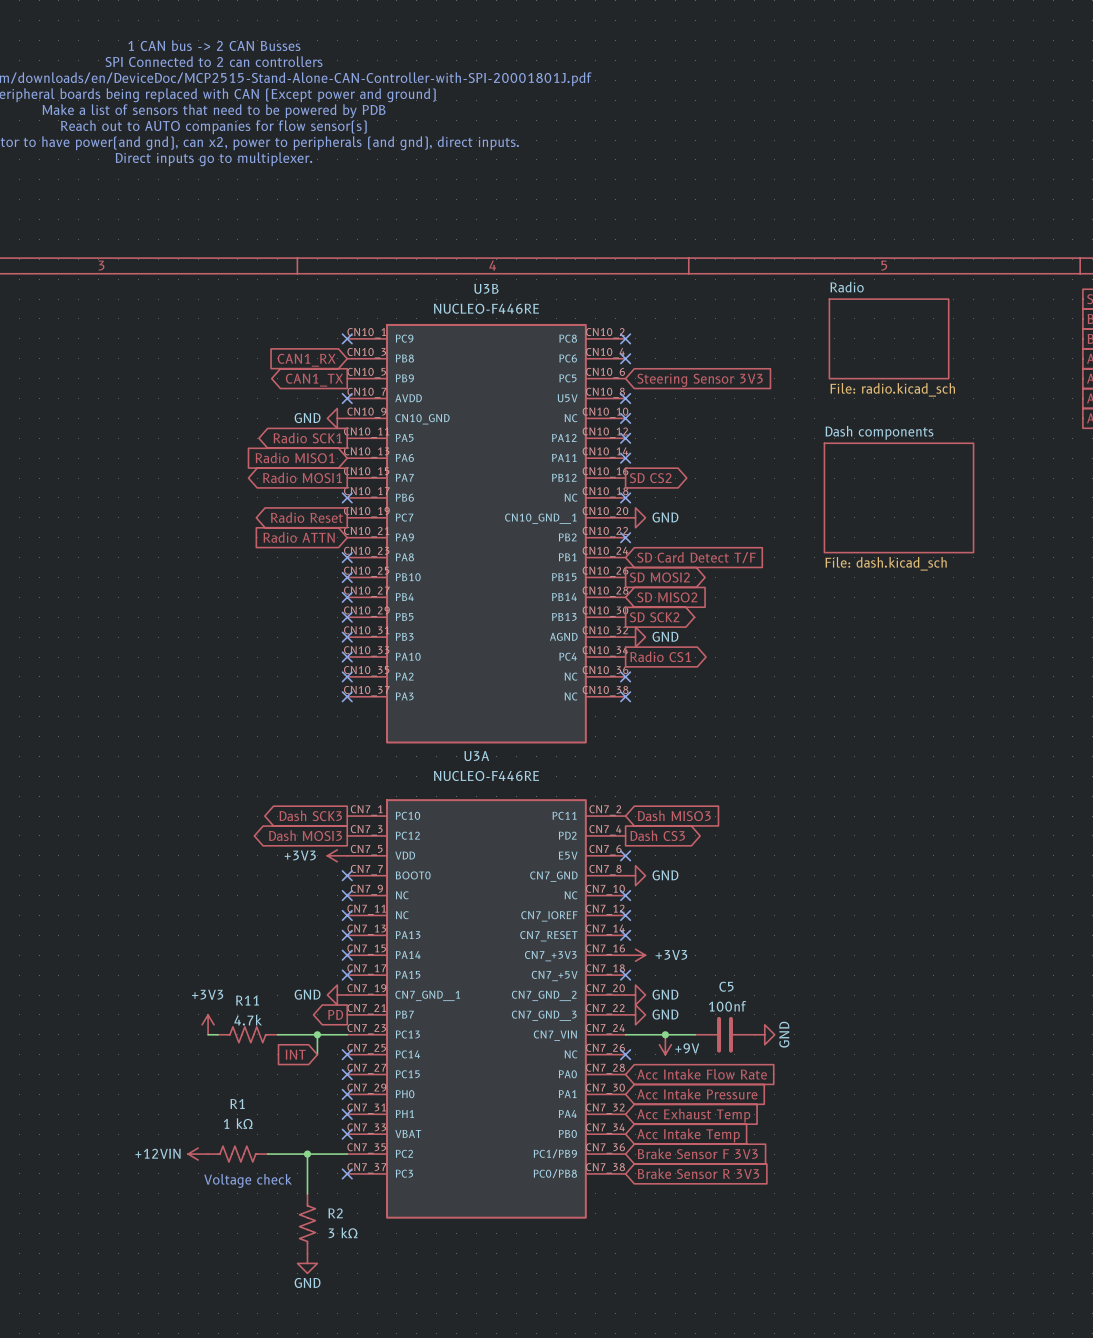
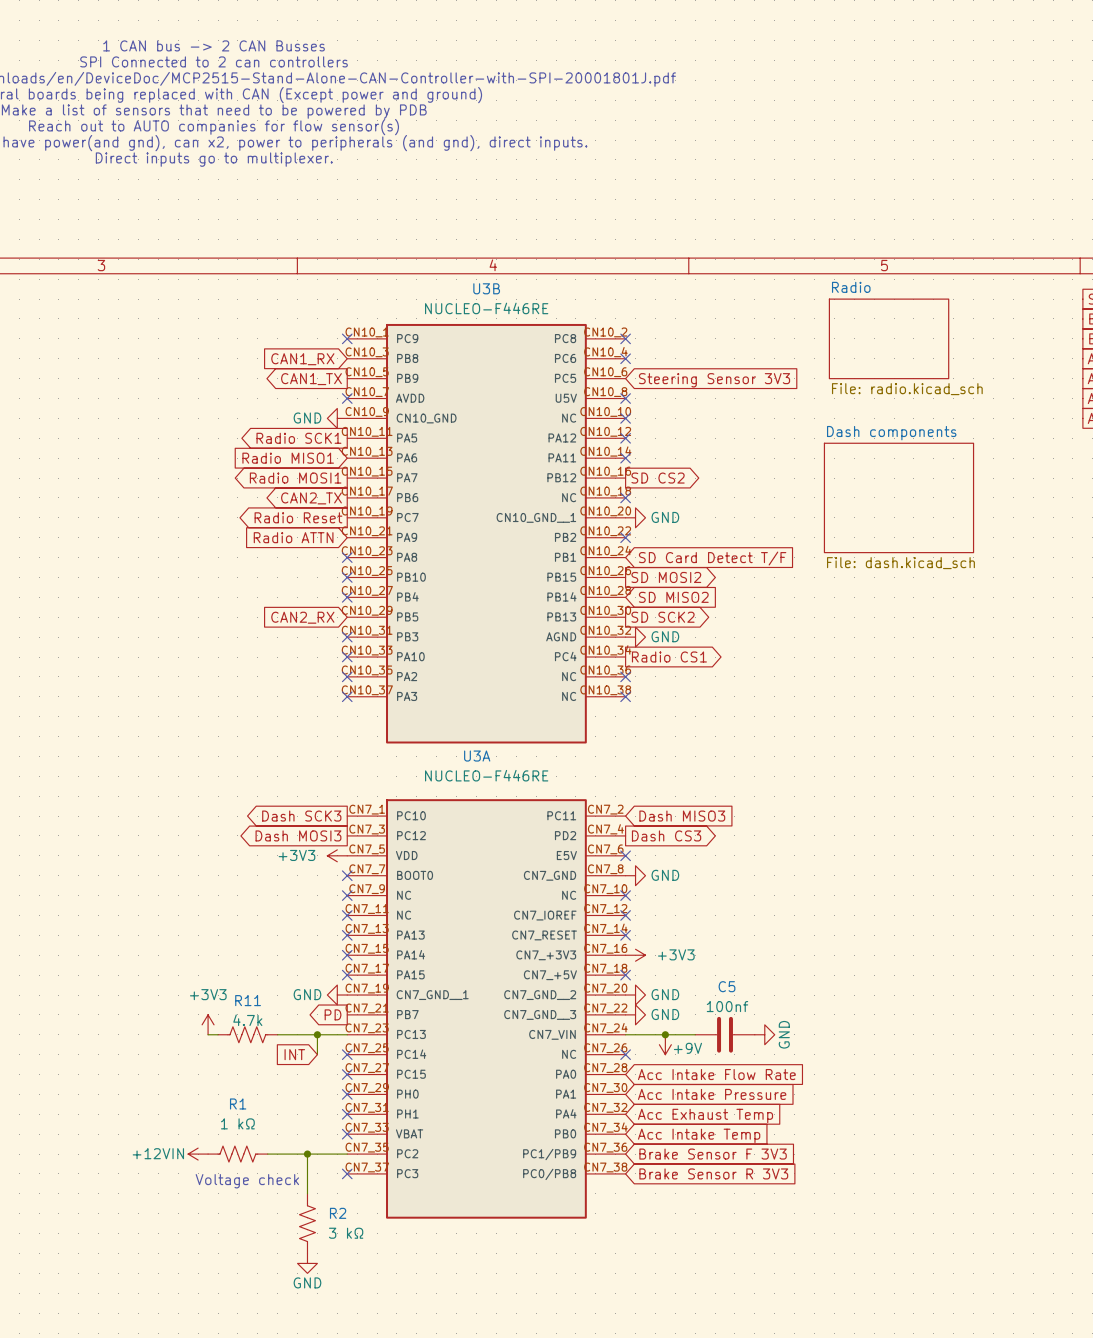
no-connect mark: (347, 497) -> none
global label: none -> CAN2_TX (311, 498)
no-connect mark: (347, 617) -> none
global label: none -> CAN2_RX (302, 617)

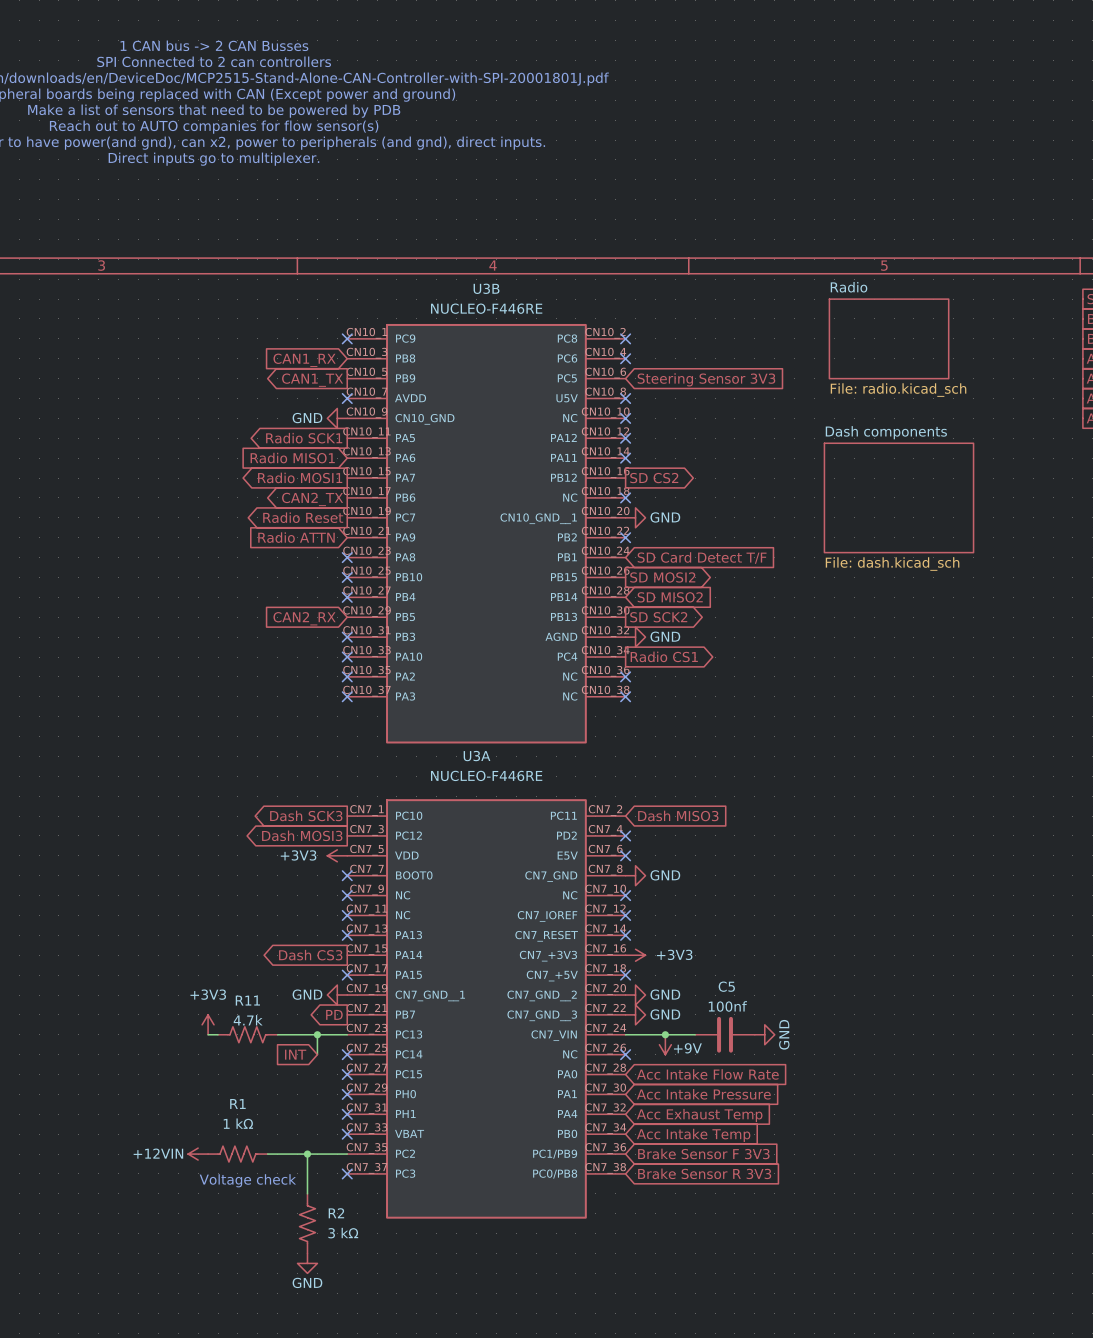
no-connect mark: none -> (625, 835)
global label: Dash CS3 (666, 835) -> none
global label: none -> Dash CS3 (310, 955)
no-connect mark: (347, 955) -> none

